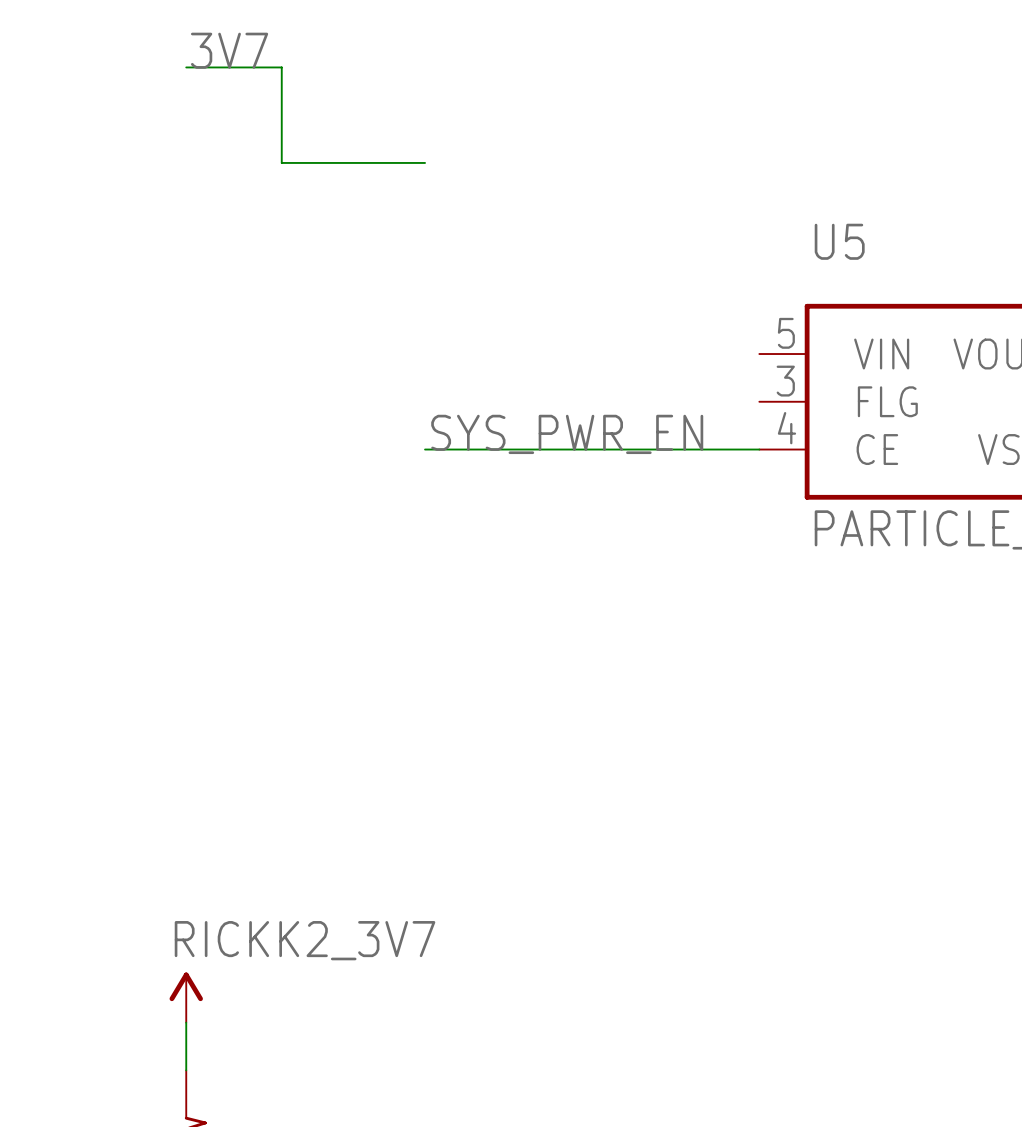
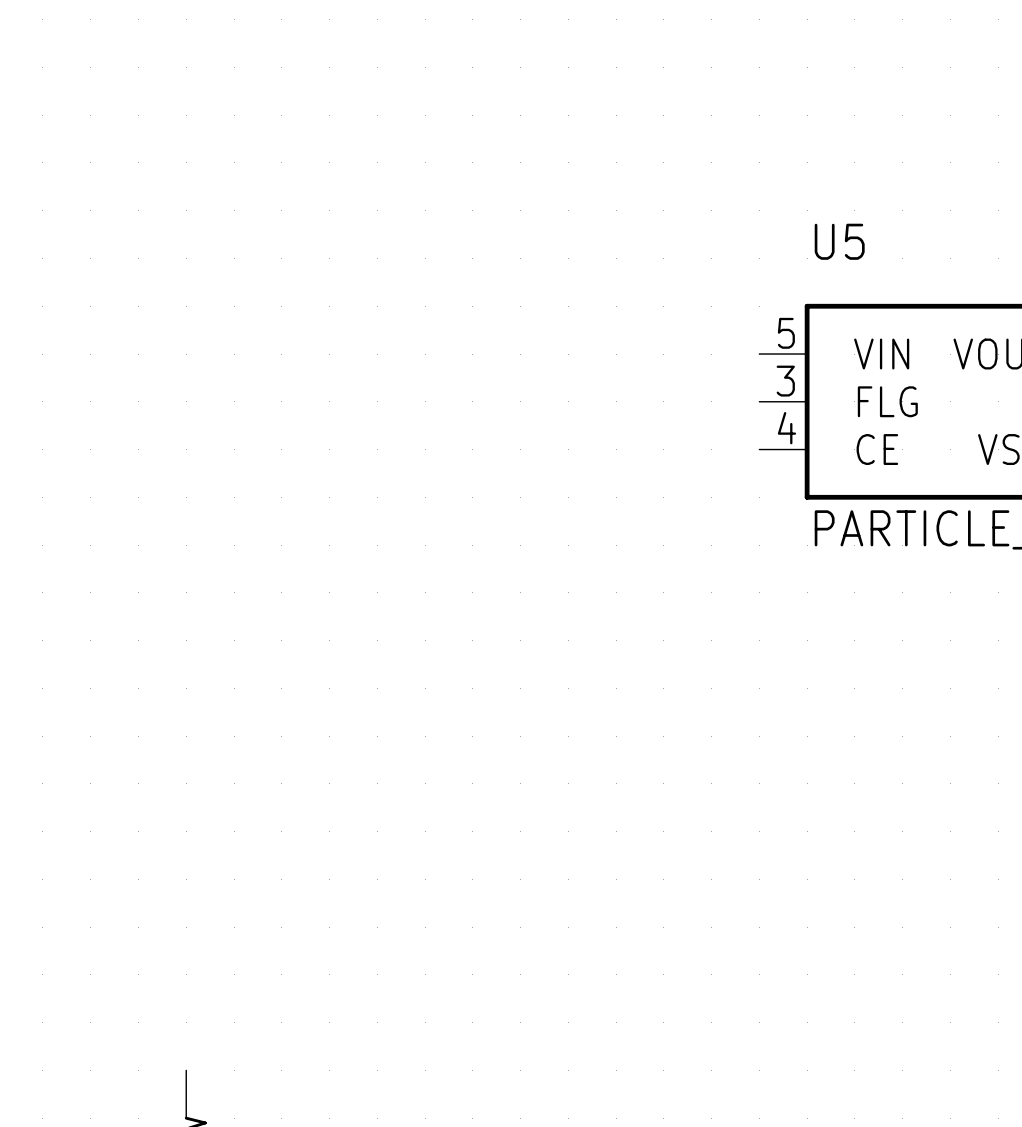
label: 3V7 (229, 50) -> none
wire: (186, 67) (281, 67) (281, 162) (425, 162) -> none
label: SYS_PWR_EN (567, 434) -> none
wire: (425, 449) (759, 449) -> none
power symbol: RICKK2_3V7 (186, 997) -> none
wire: (186, 1022) (186, 1070) -> none

